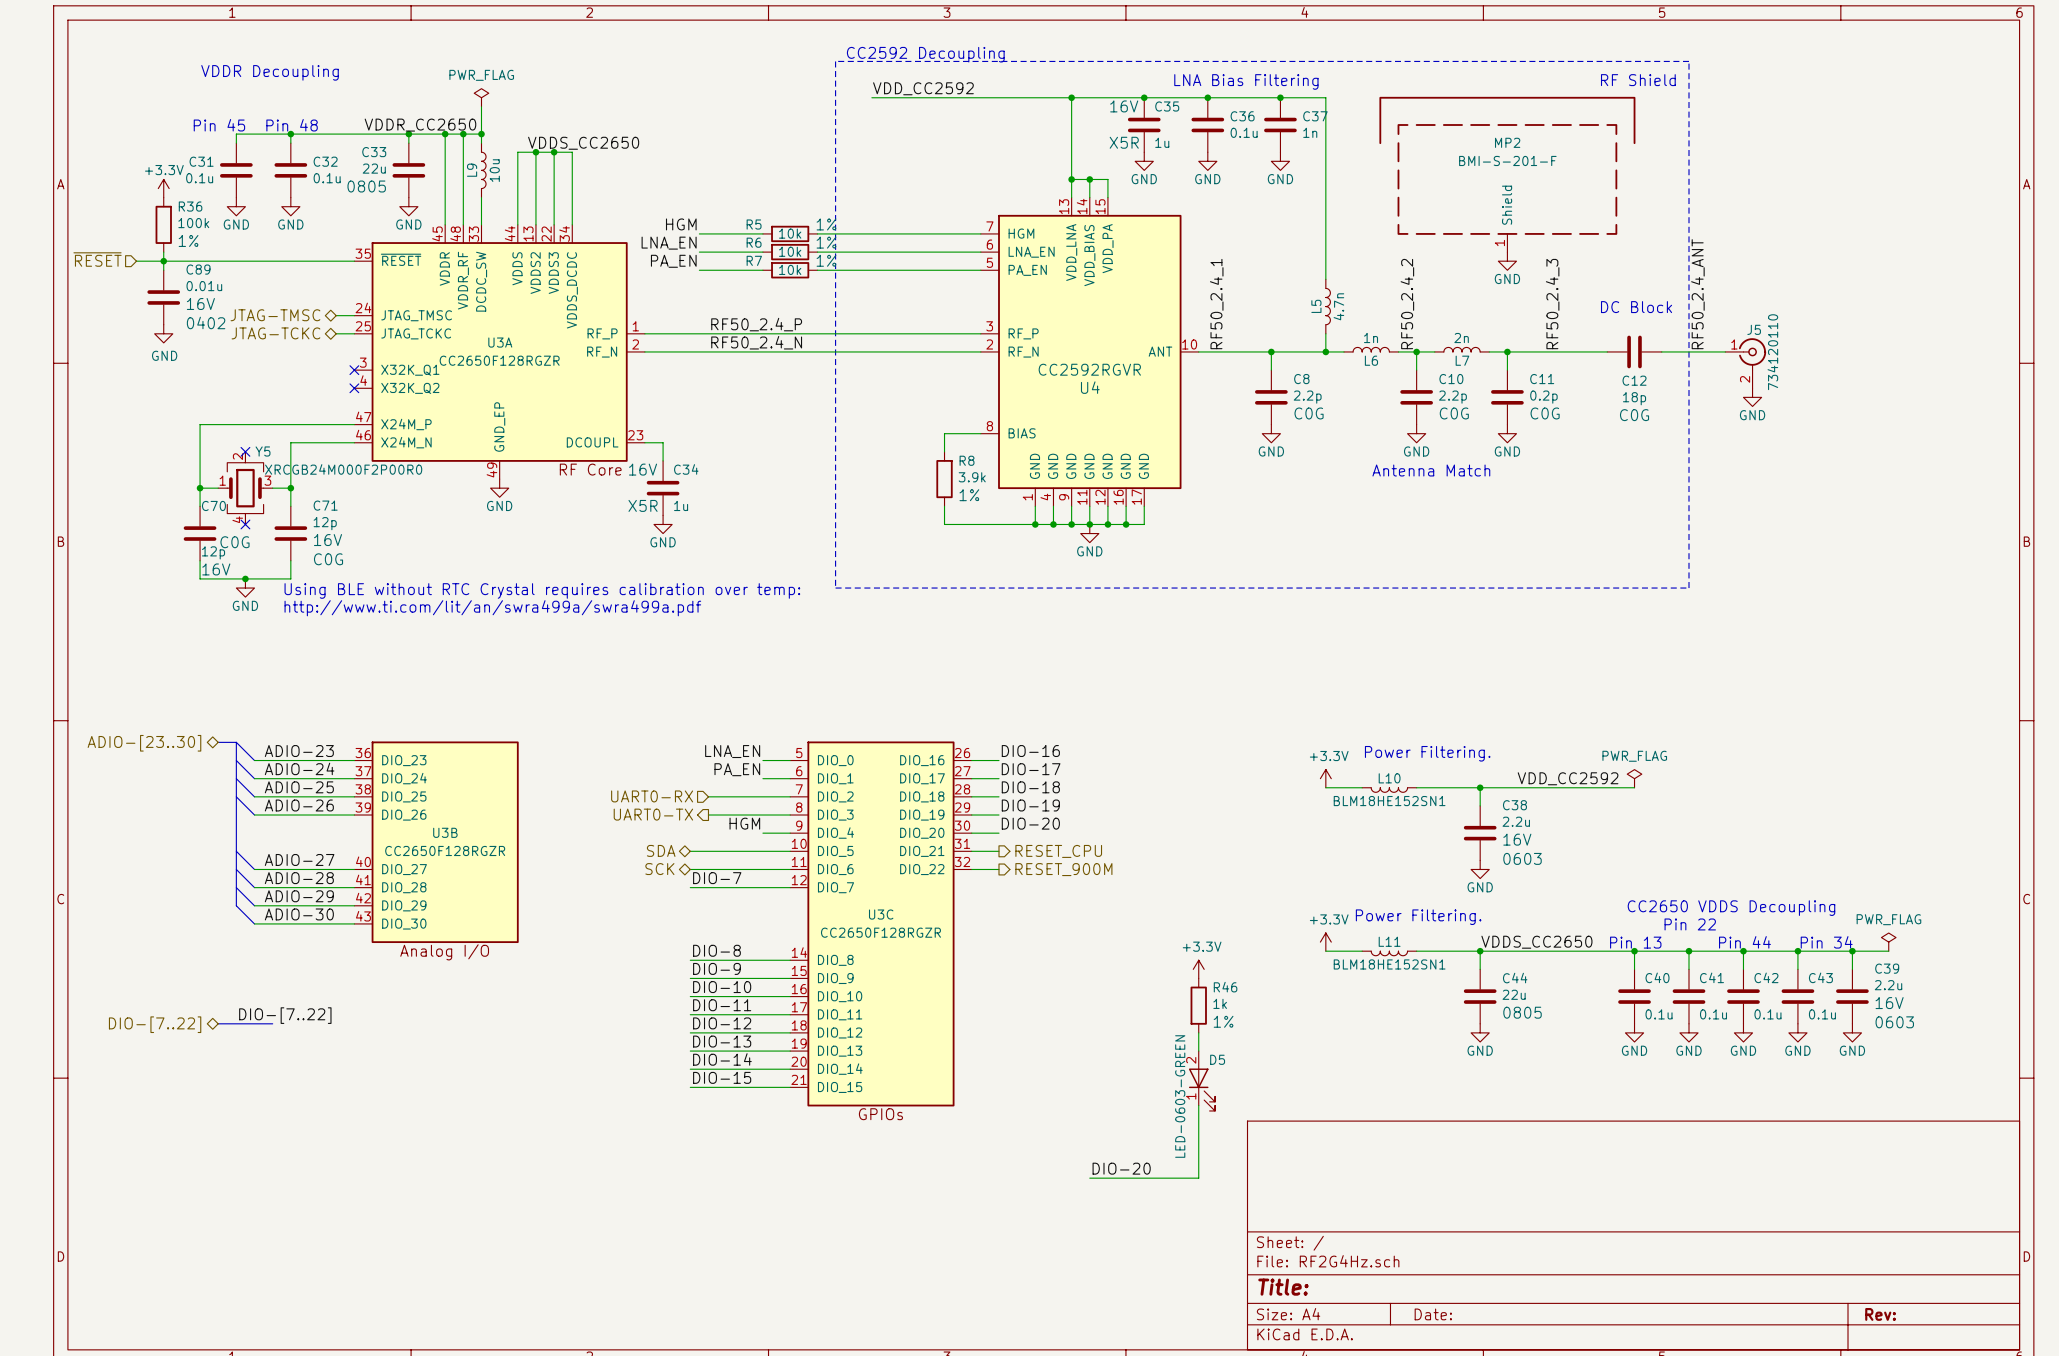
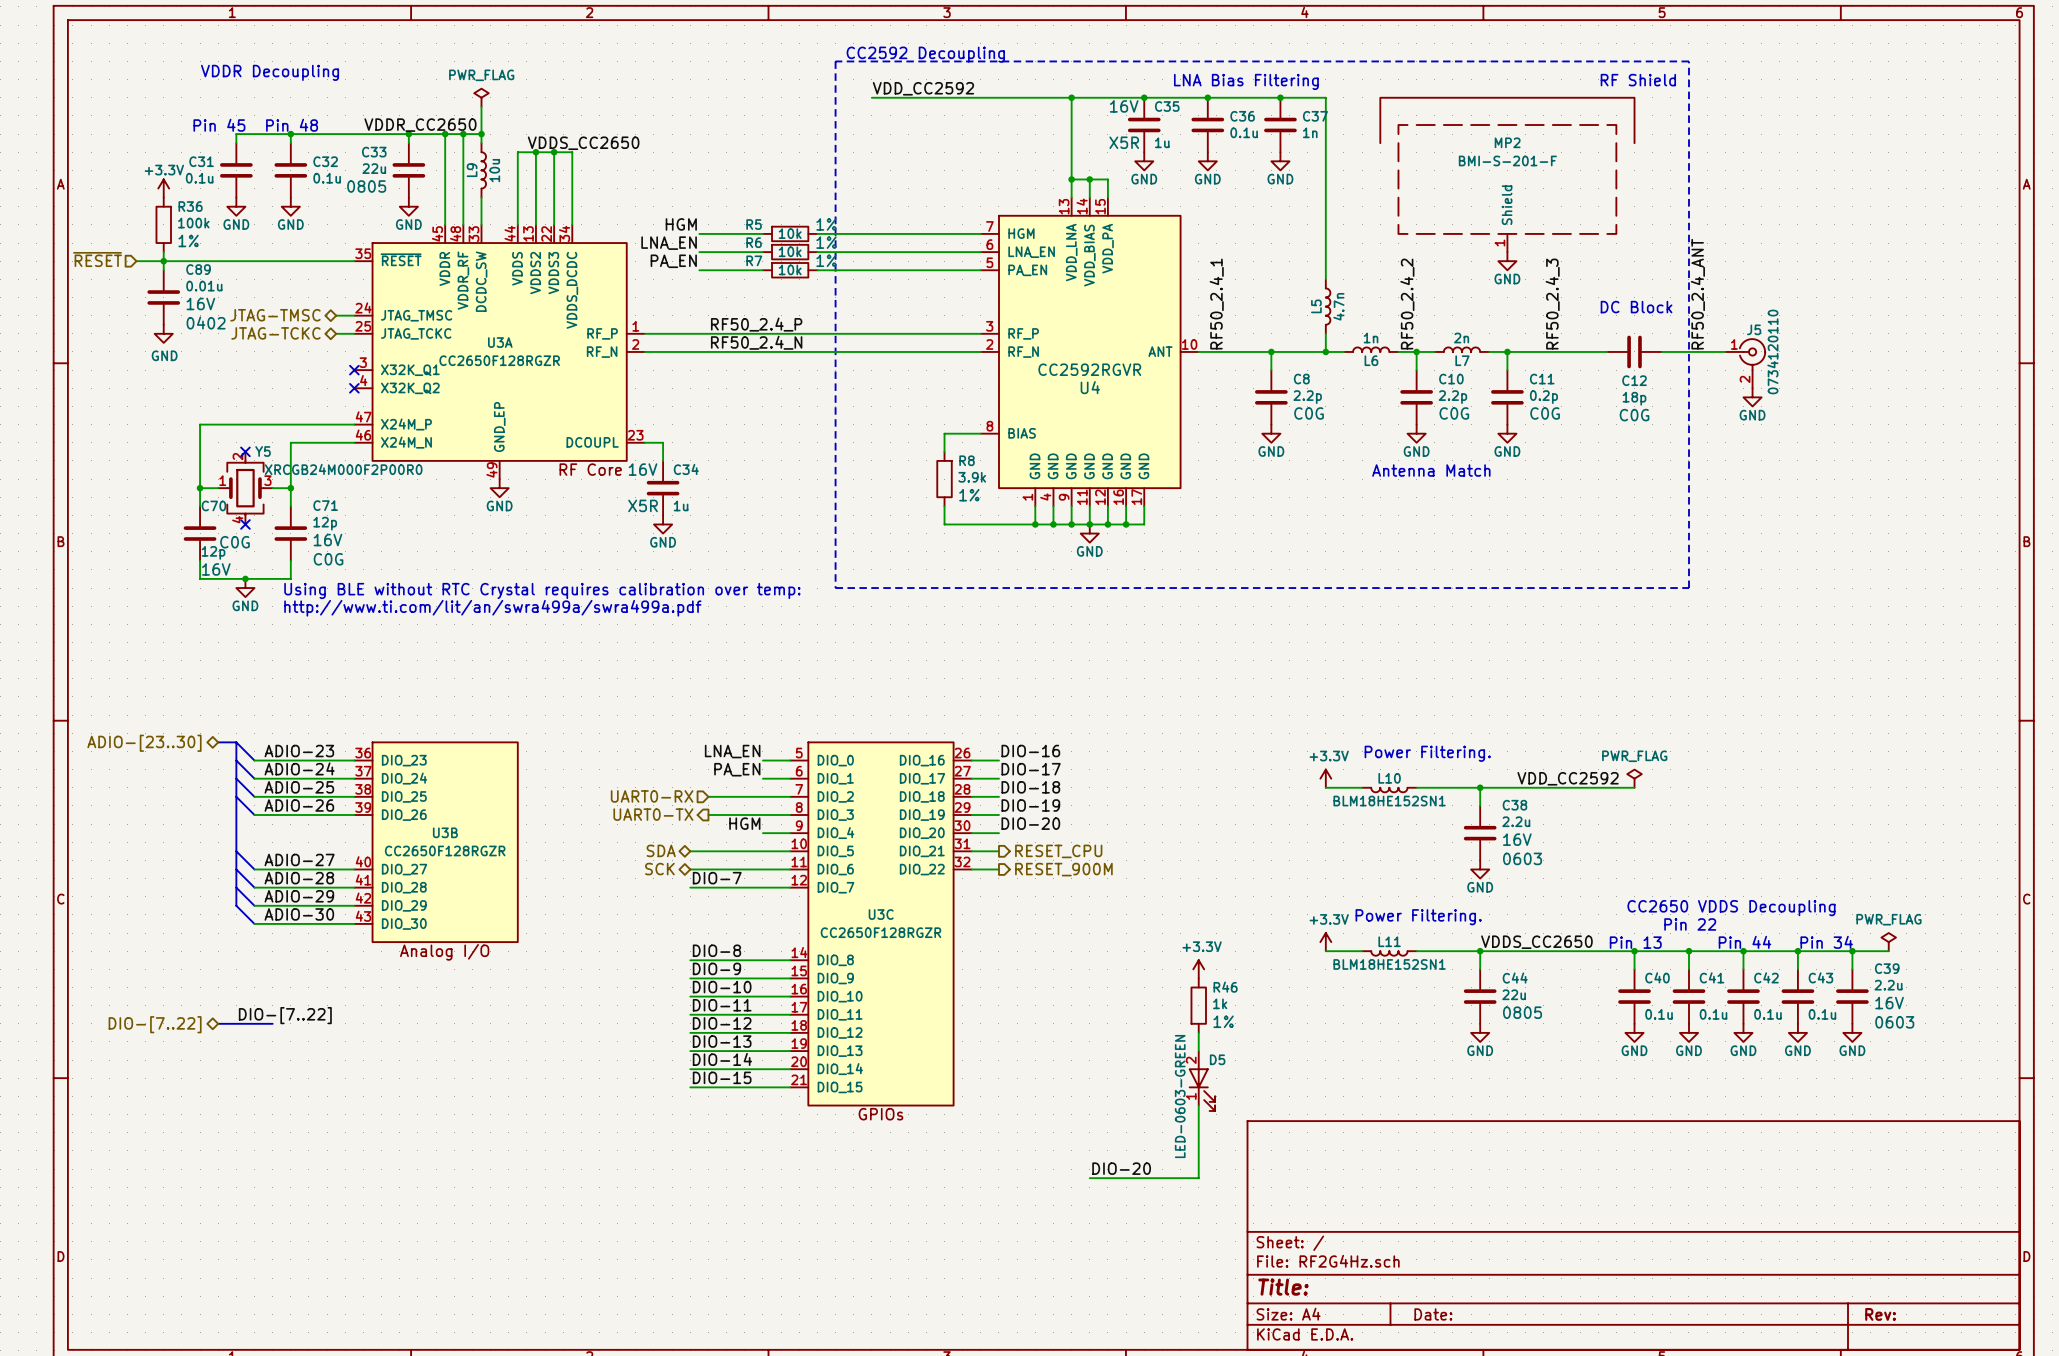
J5 value: 734120110 (1772, 352) -> 0734120110 (1772, 351)

